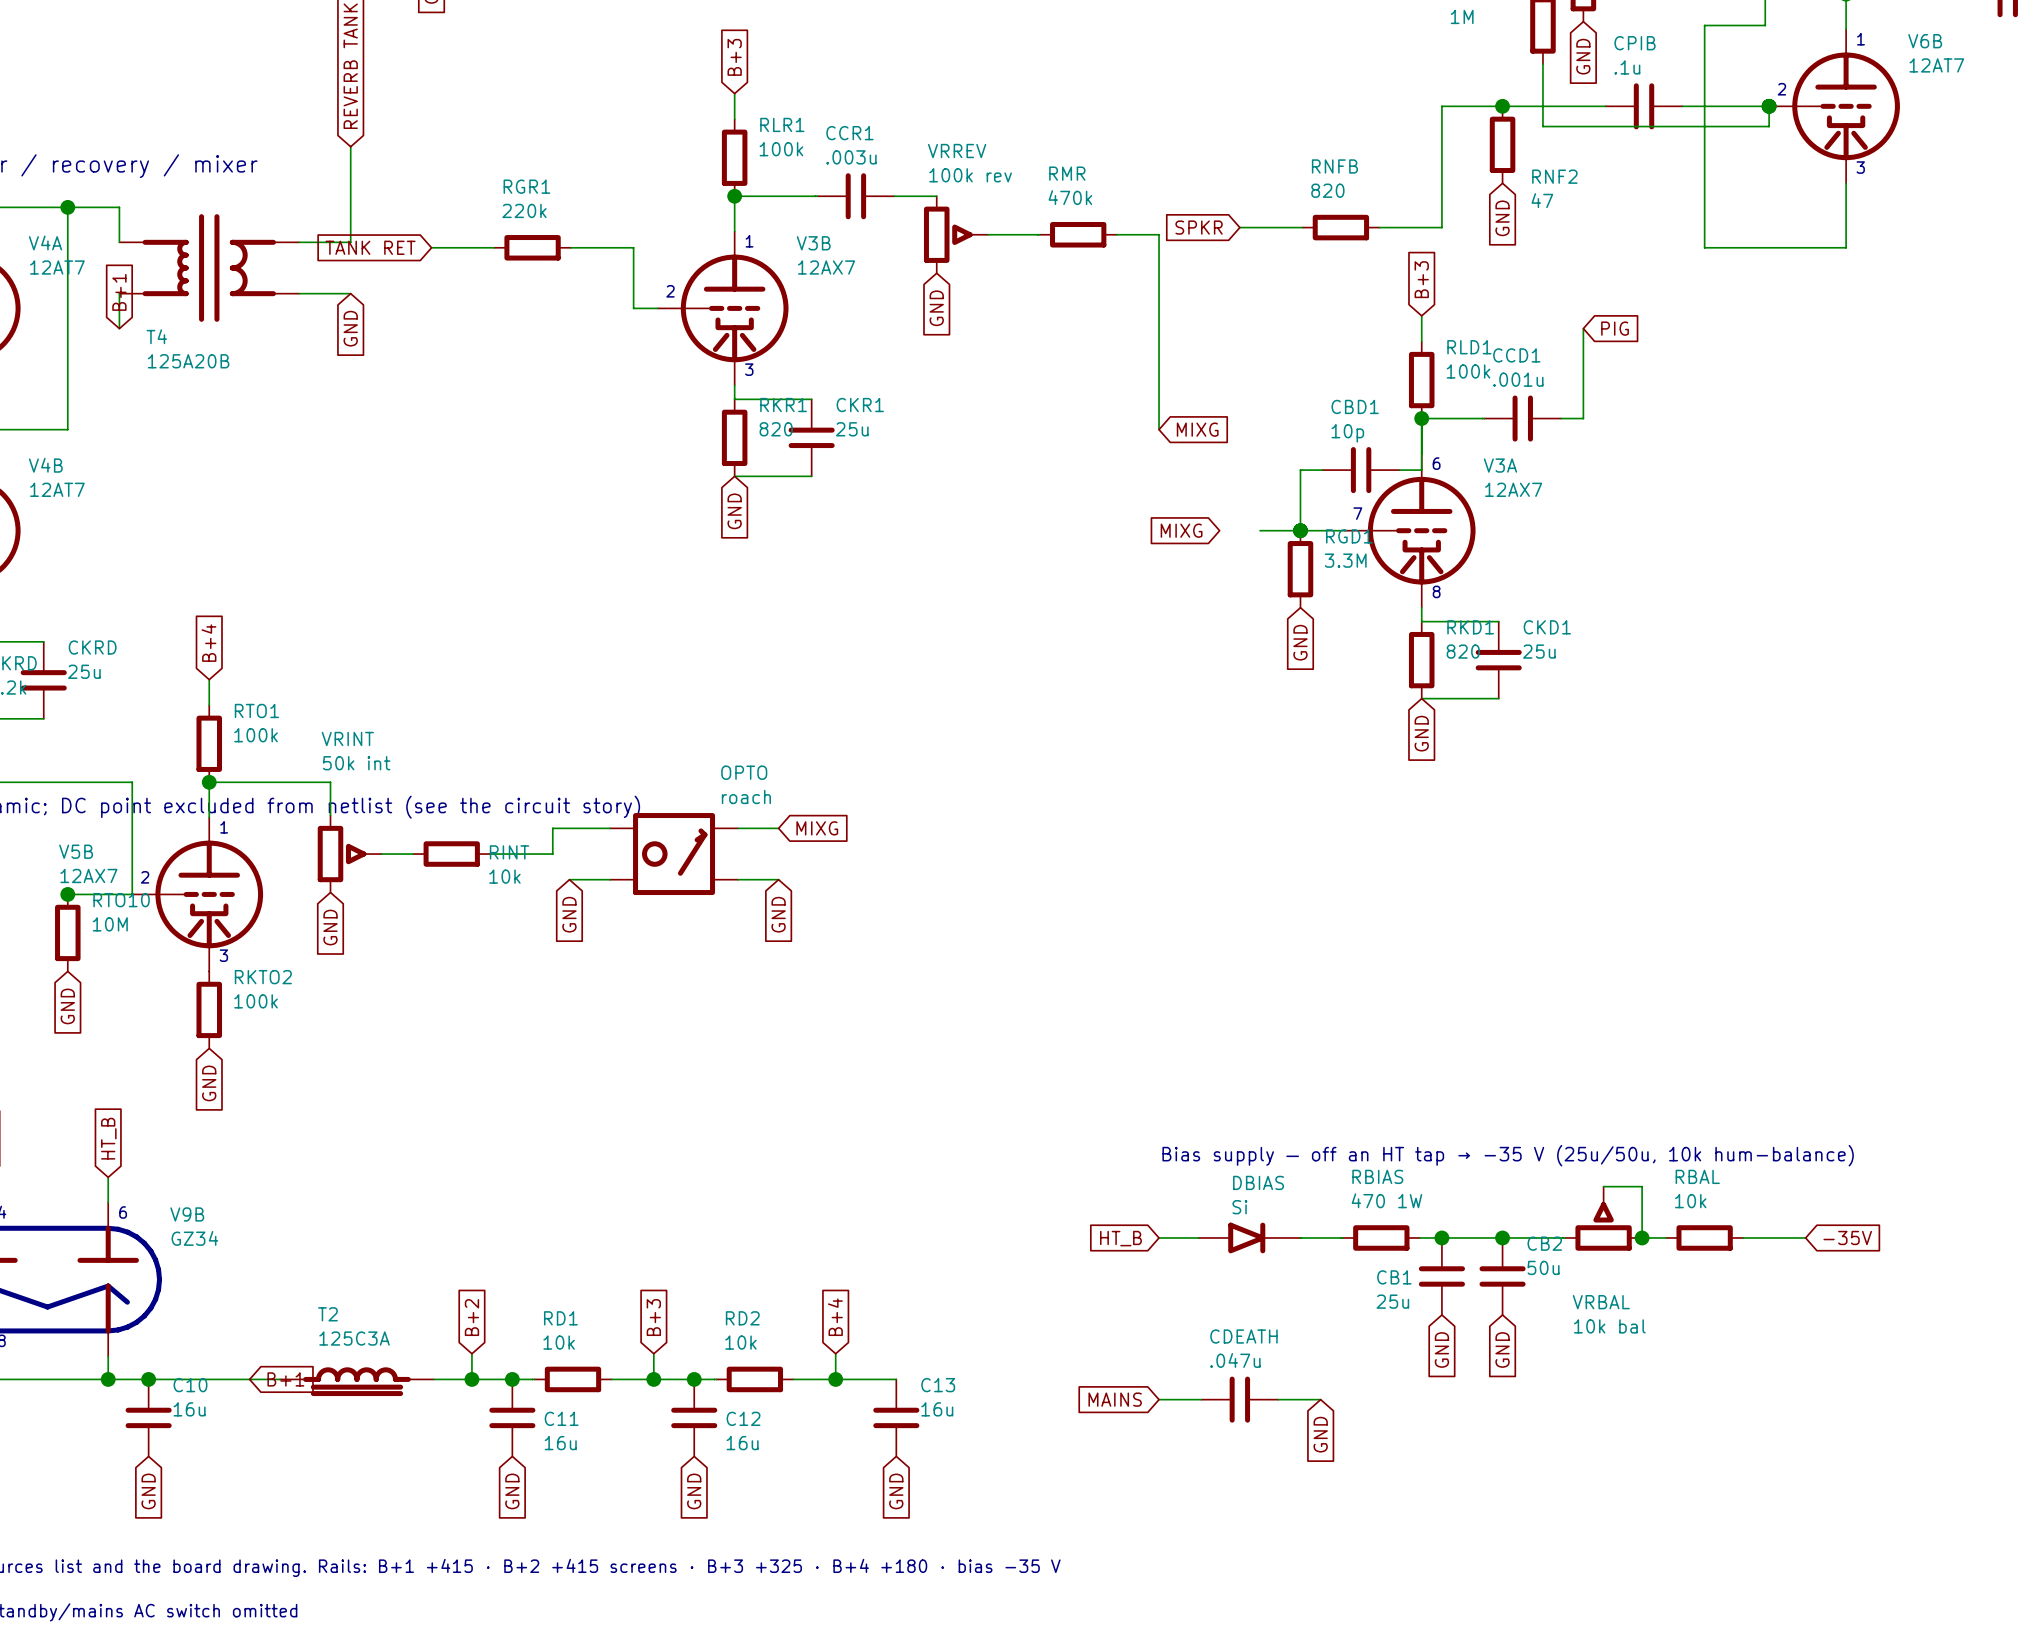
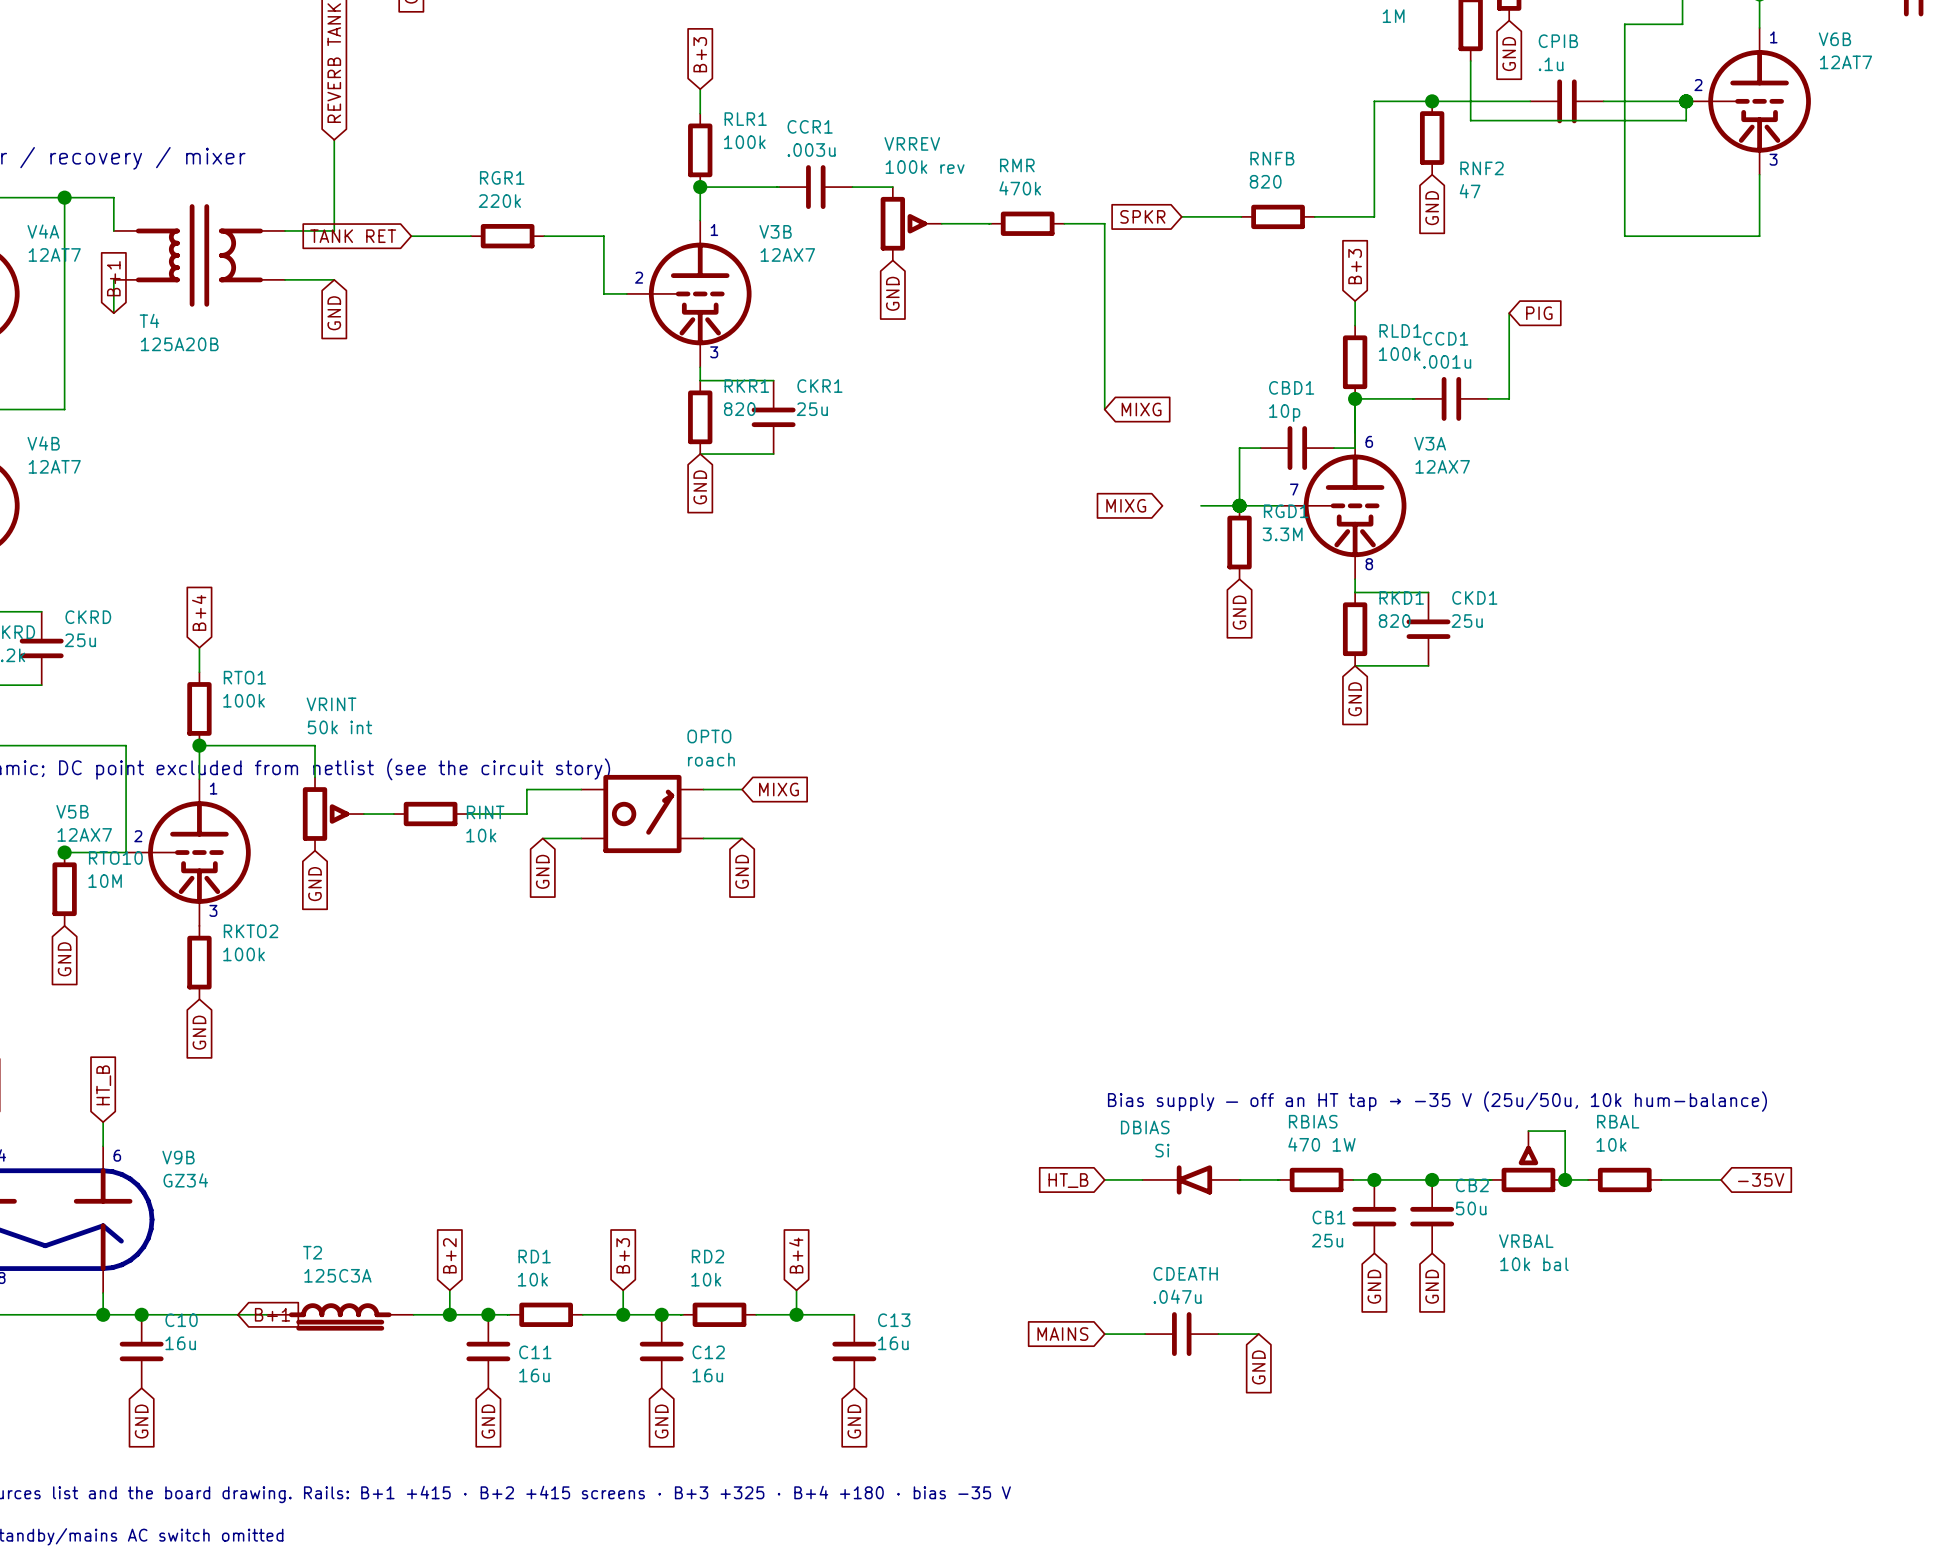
DBIAS name position: DBIAS (1258, 1182) -> DBIAS (1145, 1127)
DBIAS value position: Si (1239, 1207) -> Si (1162, 1150)
DBIAS rotation: 0° (1246, 1237) -> 180° (1194, 1179)

